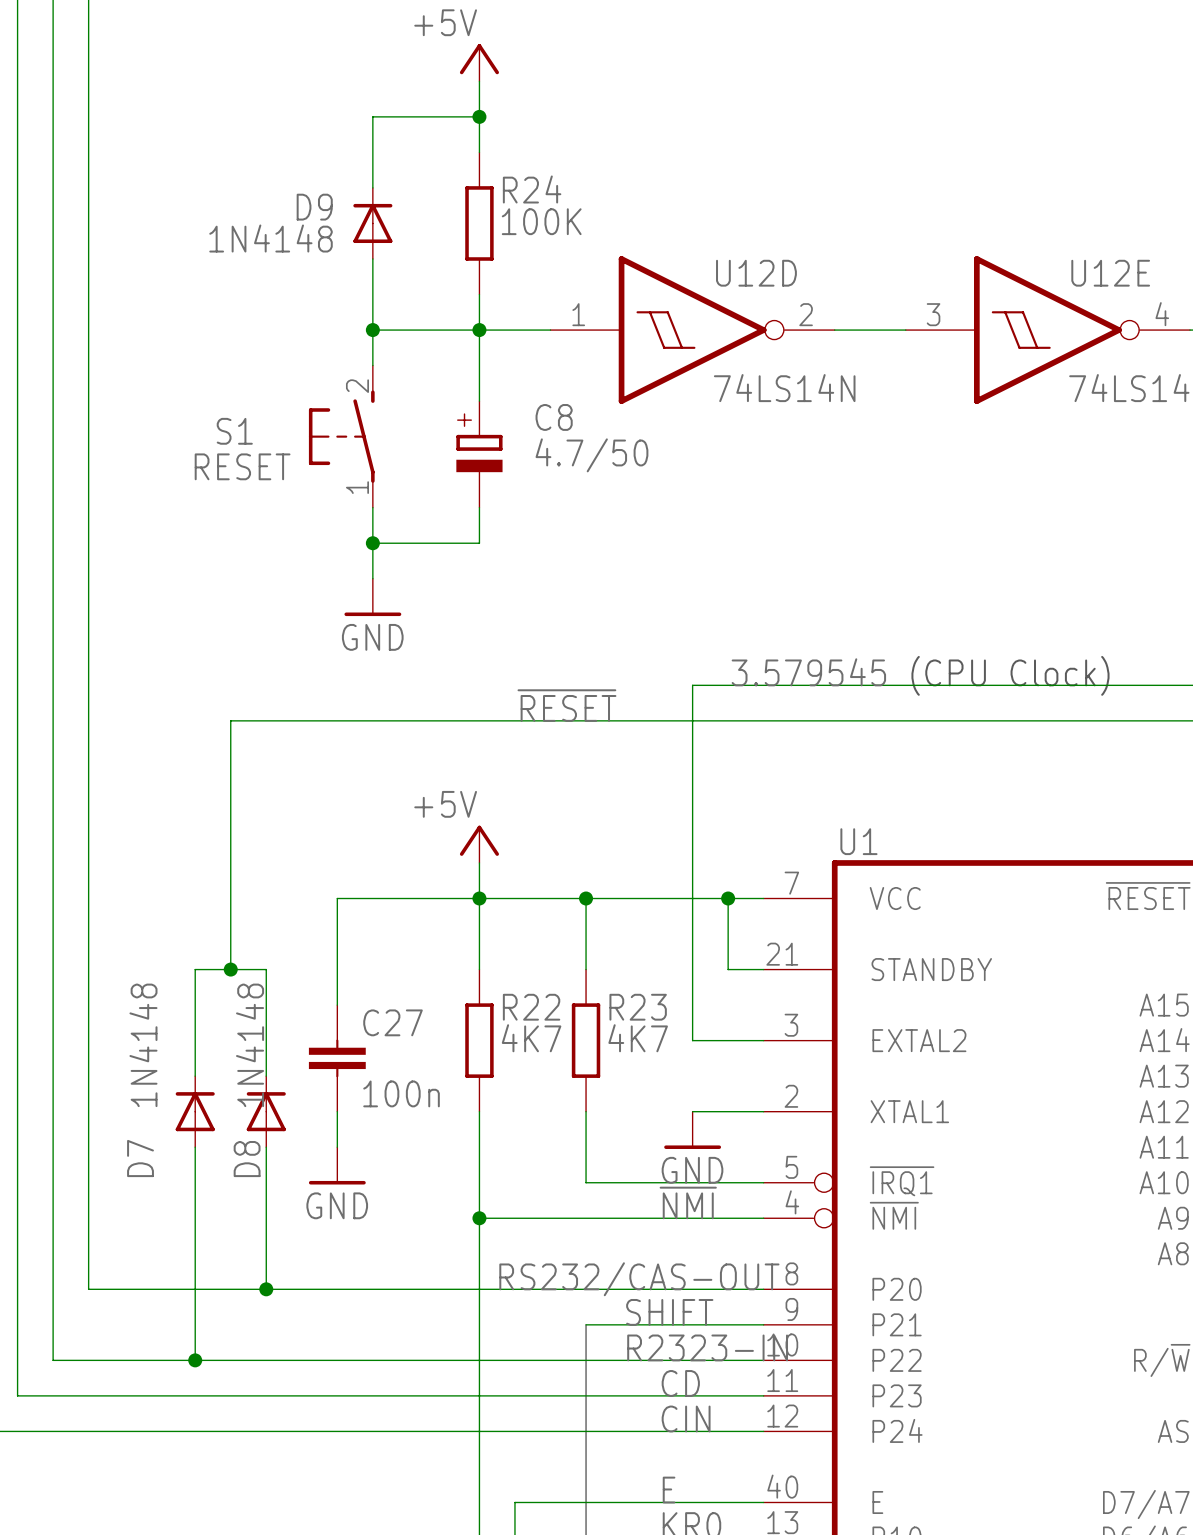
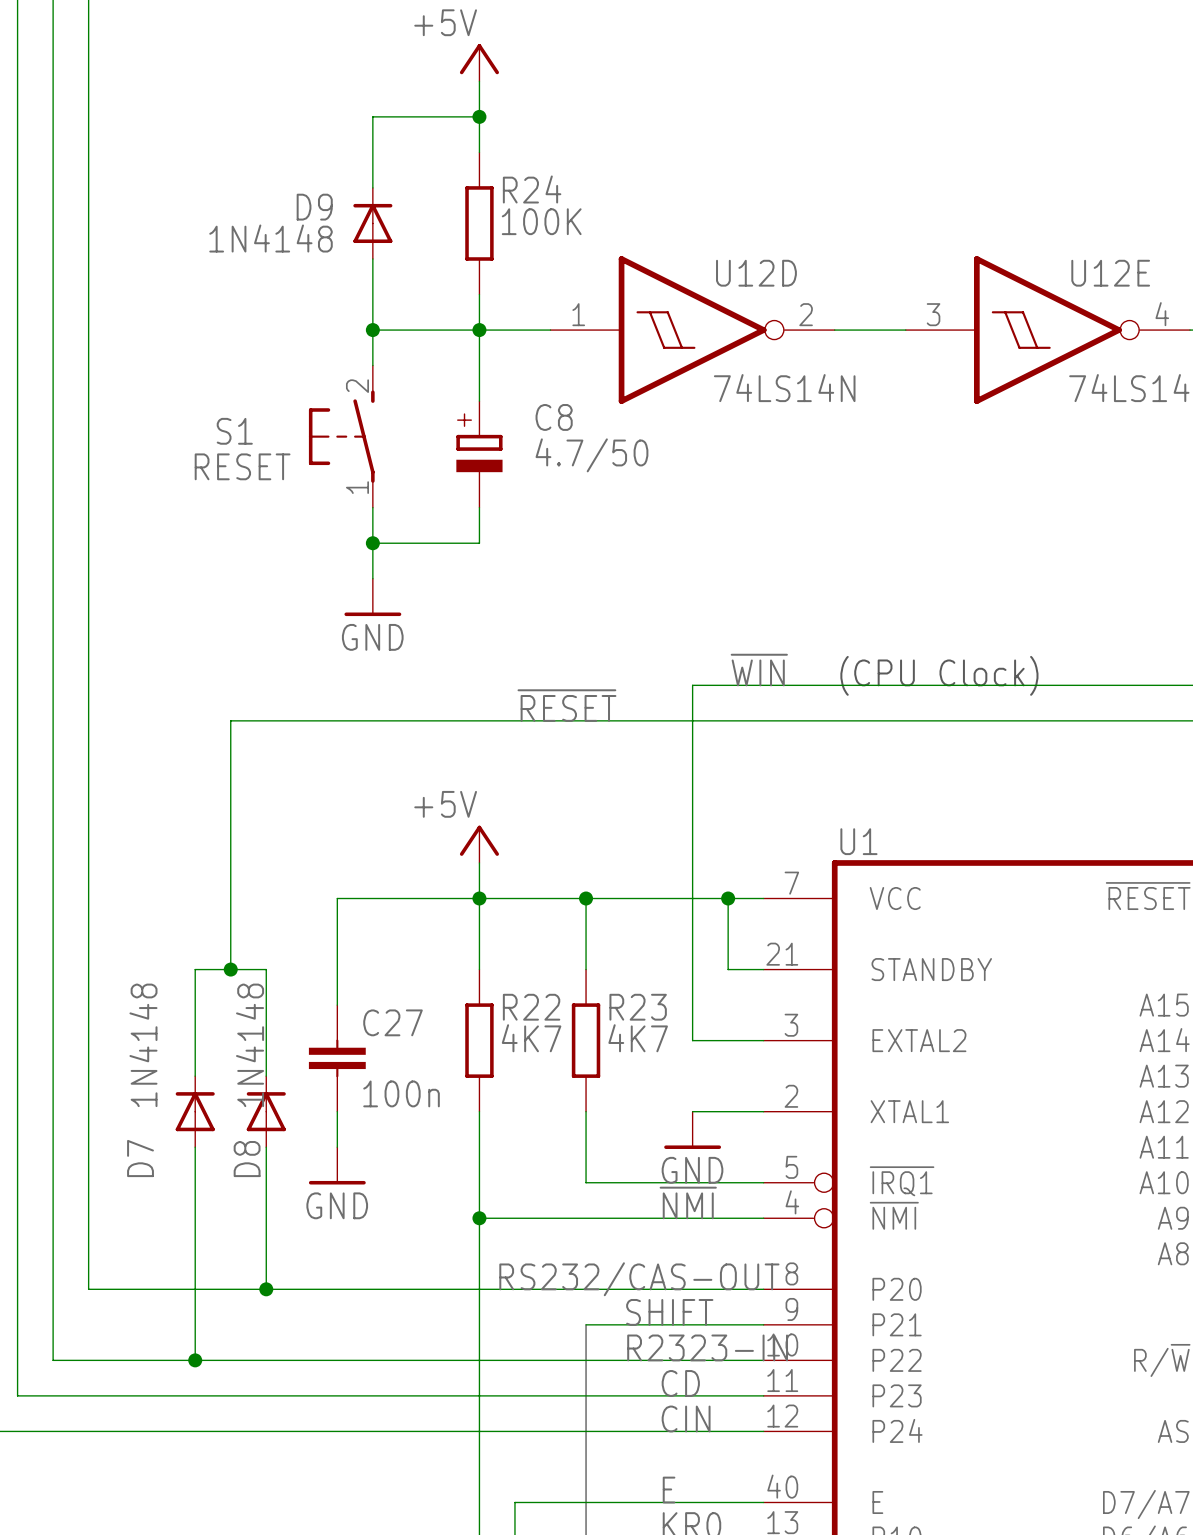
label: 3.579545 (808, 672) -> ~{WIN} (759, 670)
text position: (CPU Clock) (1010, 675) -> (CPU Clock) (939, 675)

